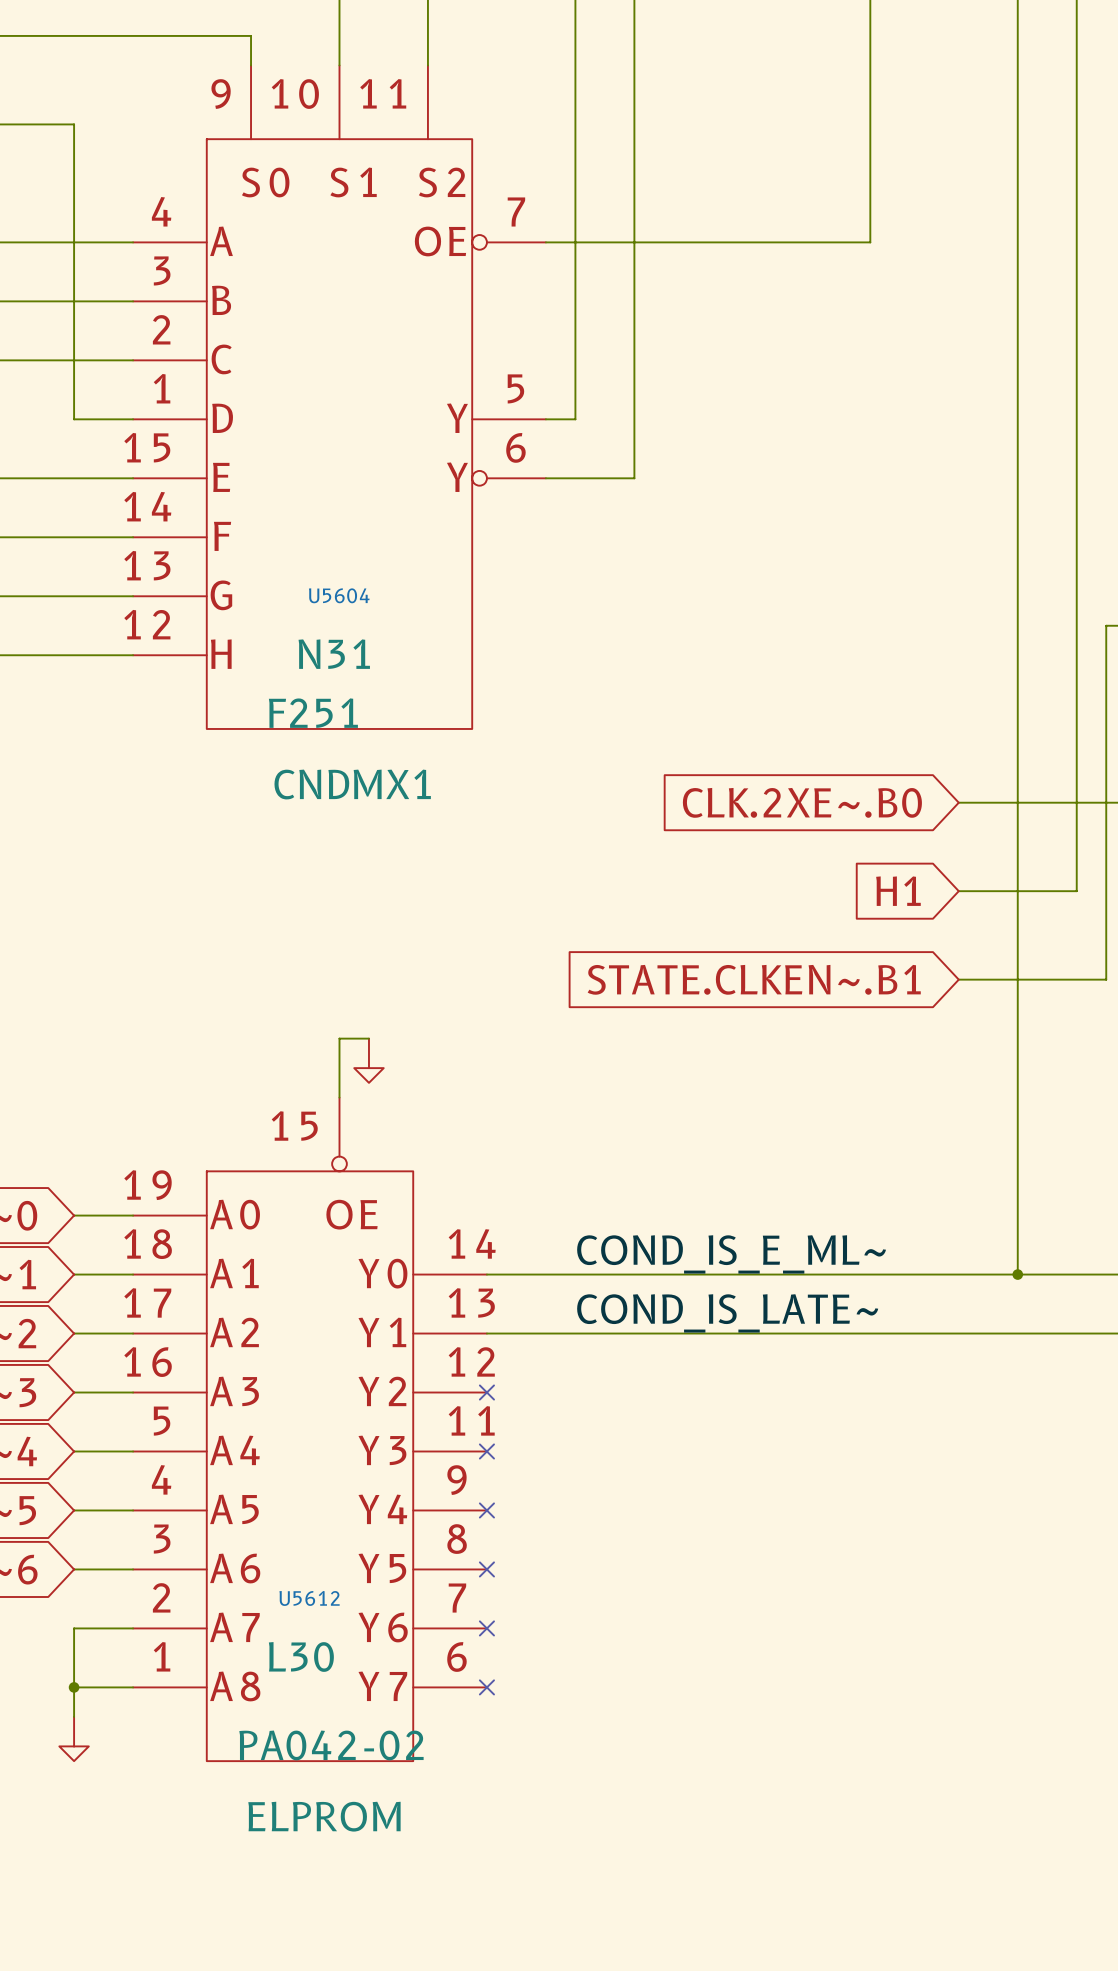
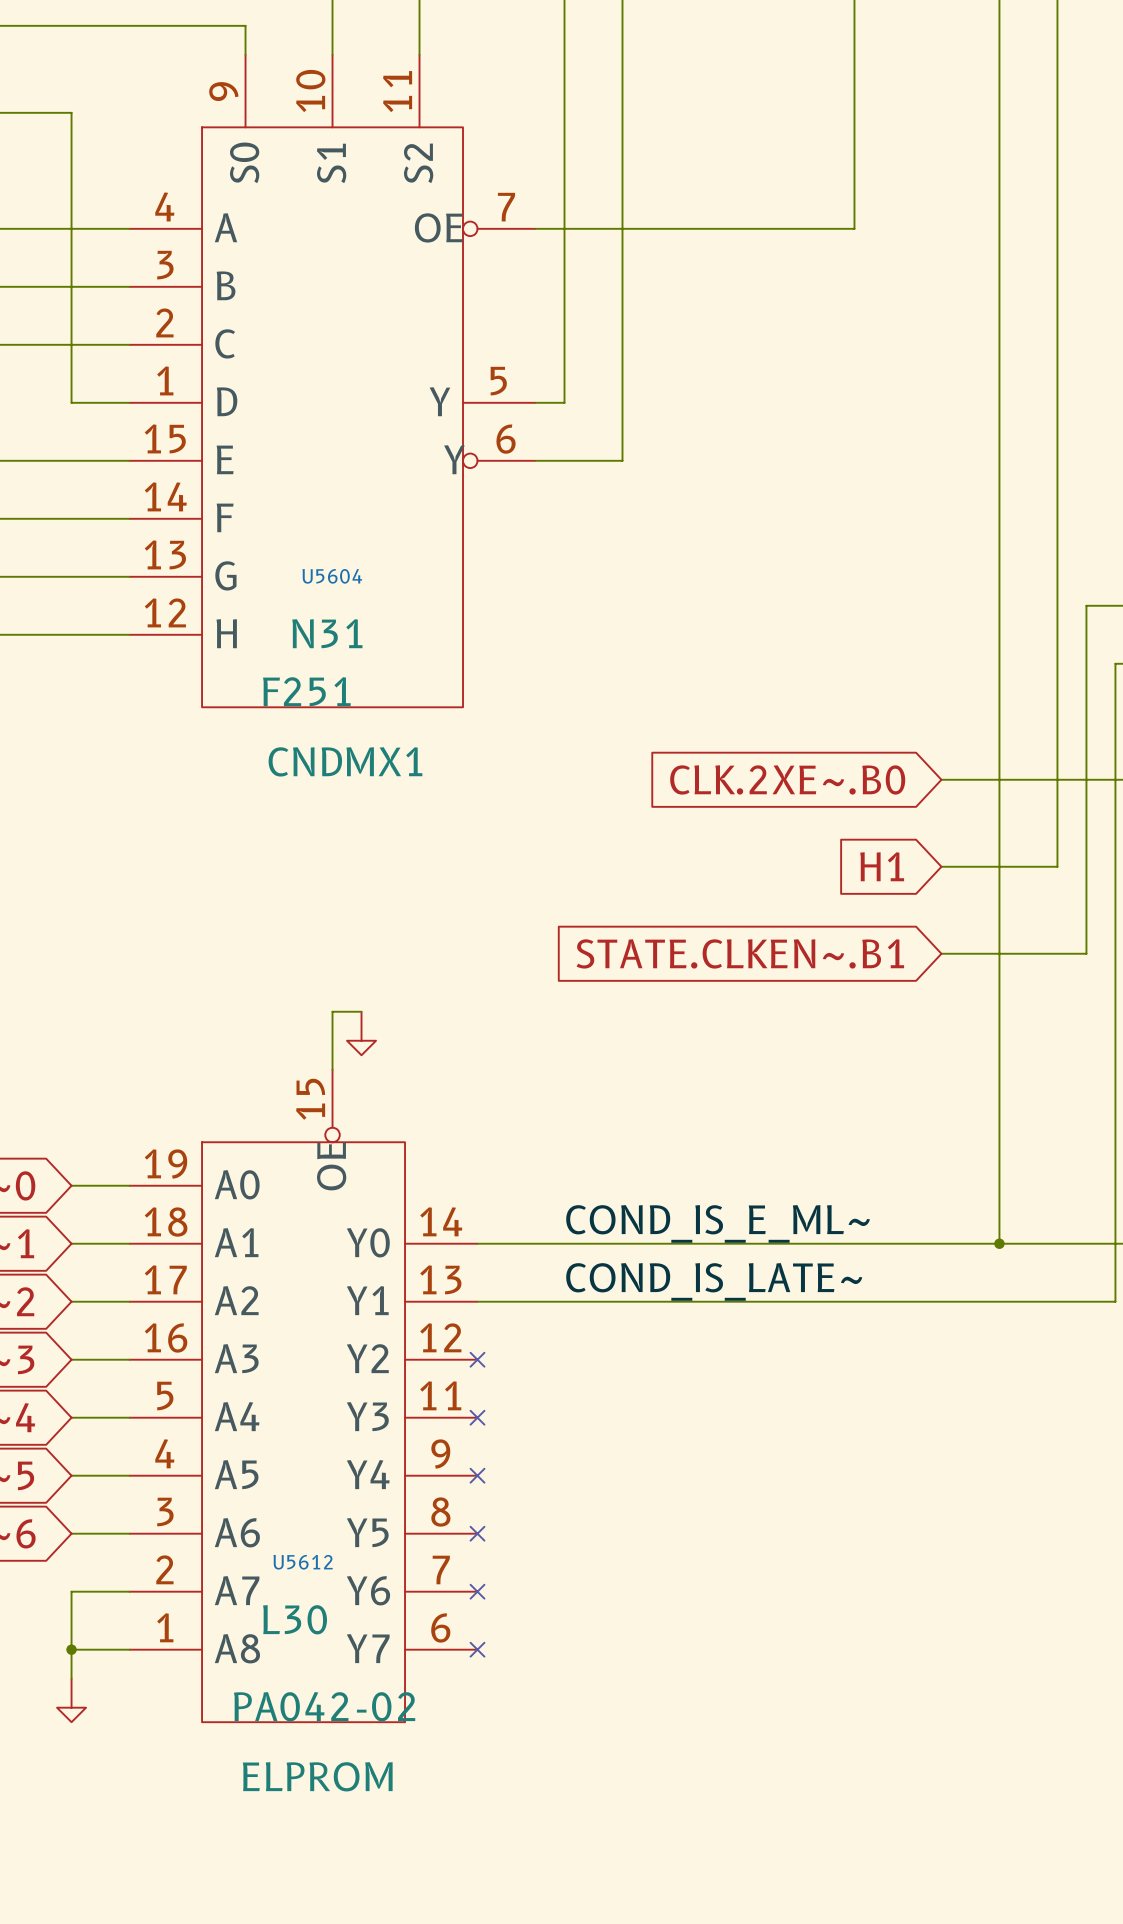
U5604 symbol: [133, 65, 546, 729] -> [129, 54, 536, 708]
U5612 symbol: [133, 1097, 487, 1762] -> [129, 1069, 478, 1723]

